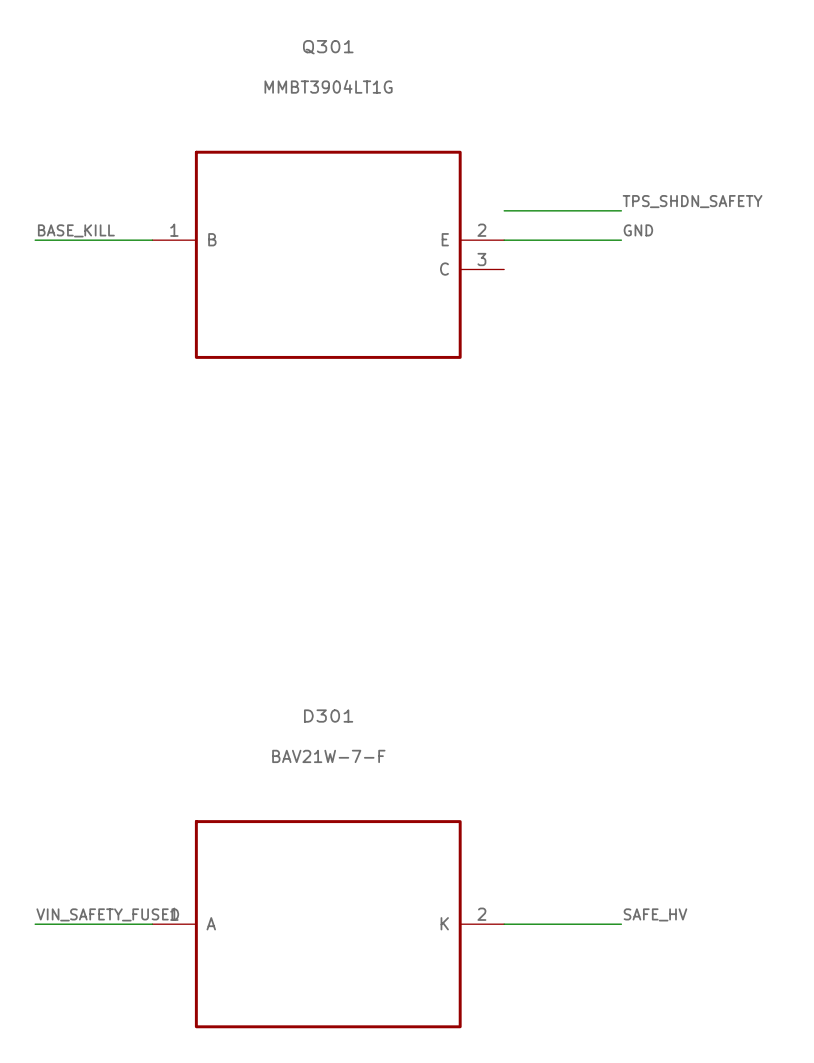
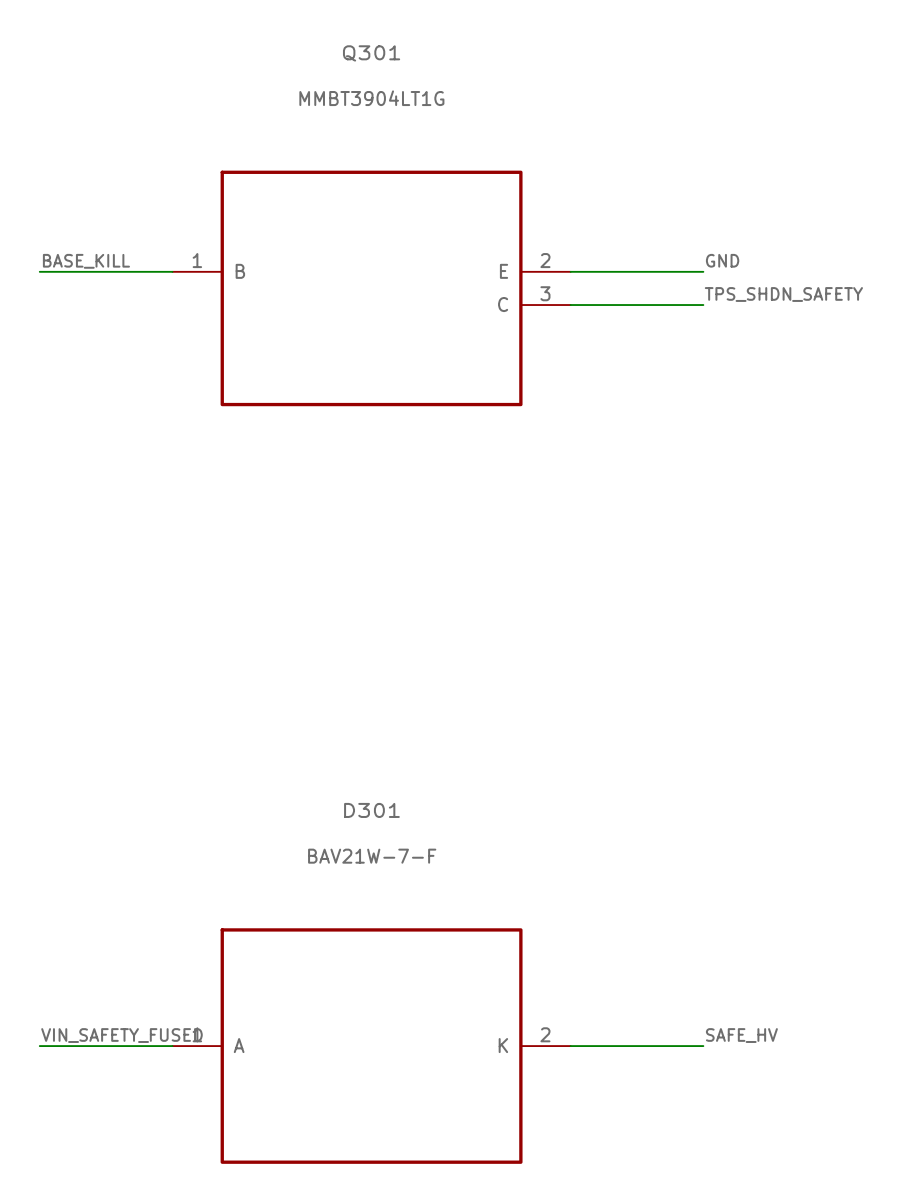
label position: TPS_SHDN_SAFETY (692, 201) -> TPS_SHDN_SAFETY (783, 294)
wire: (504, 210) (621, 210) -> (570, 305) (703, 305)

